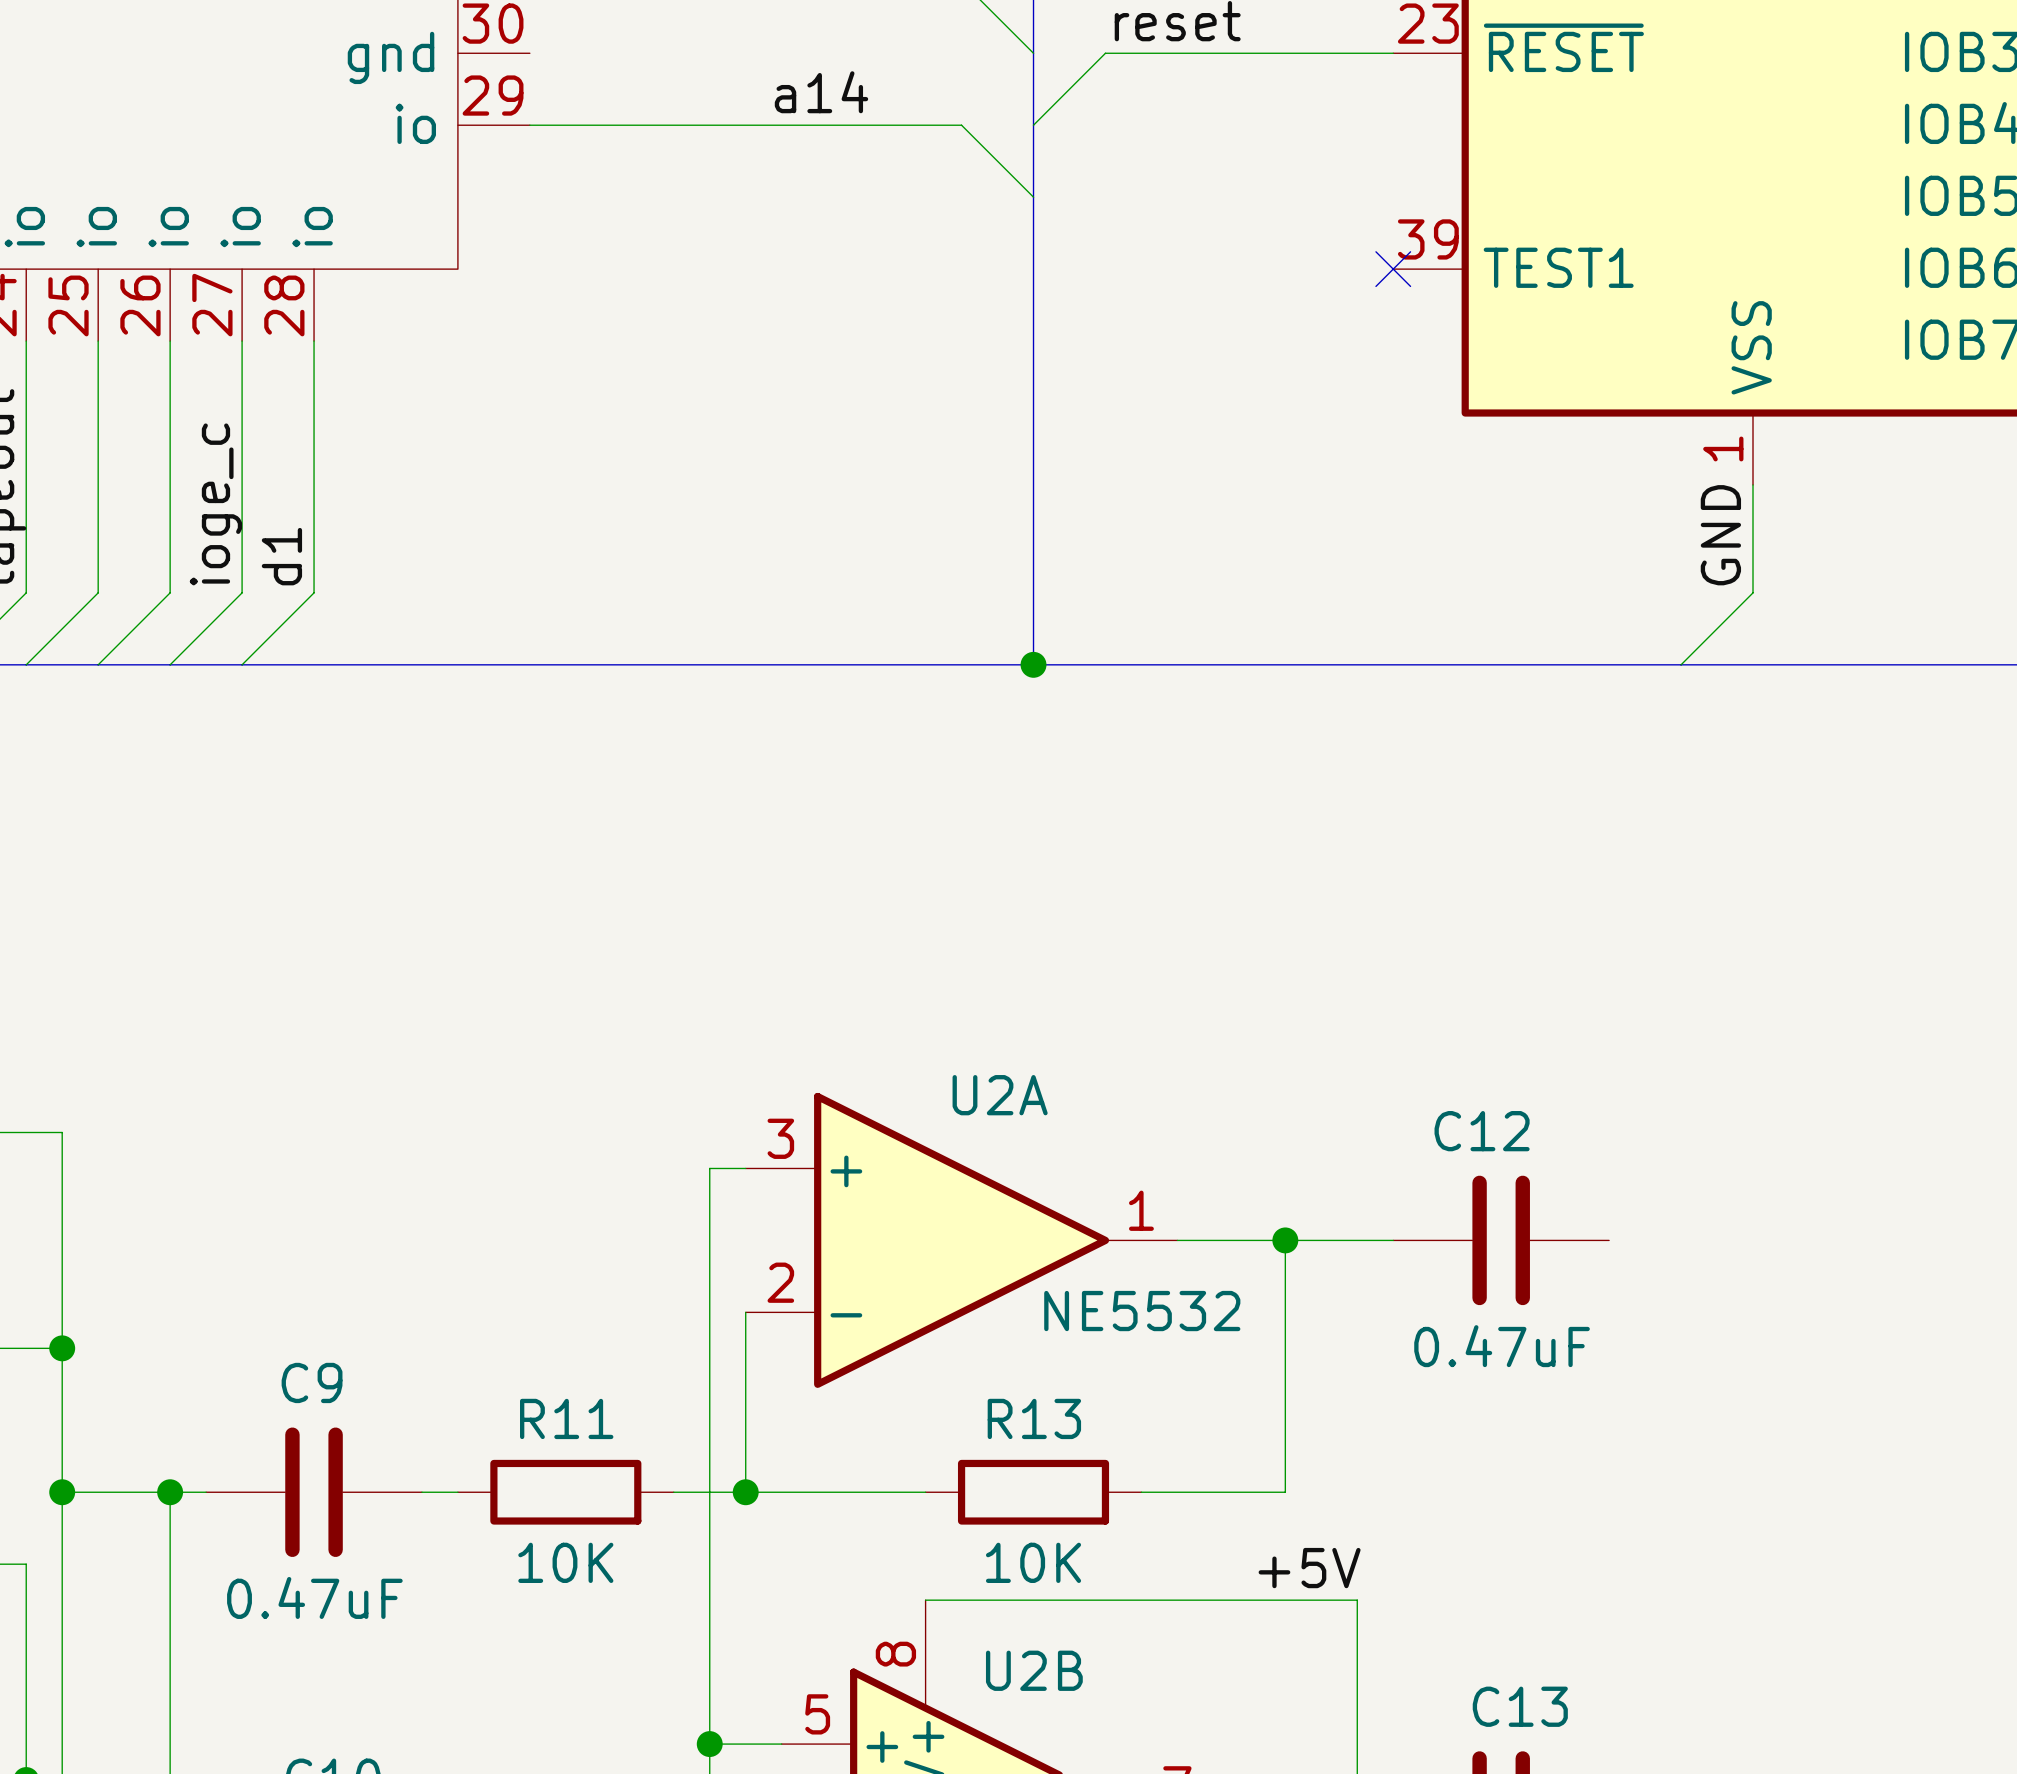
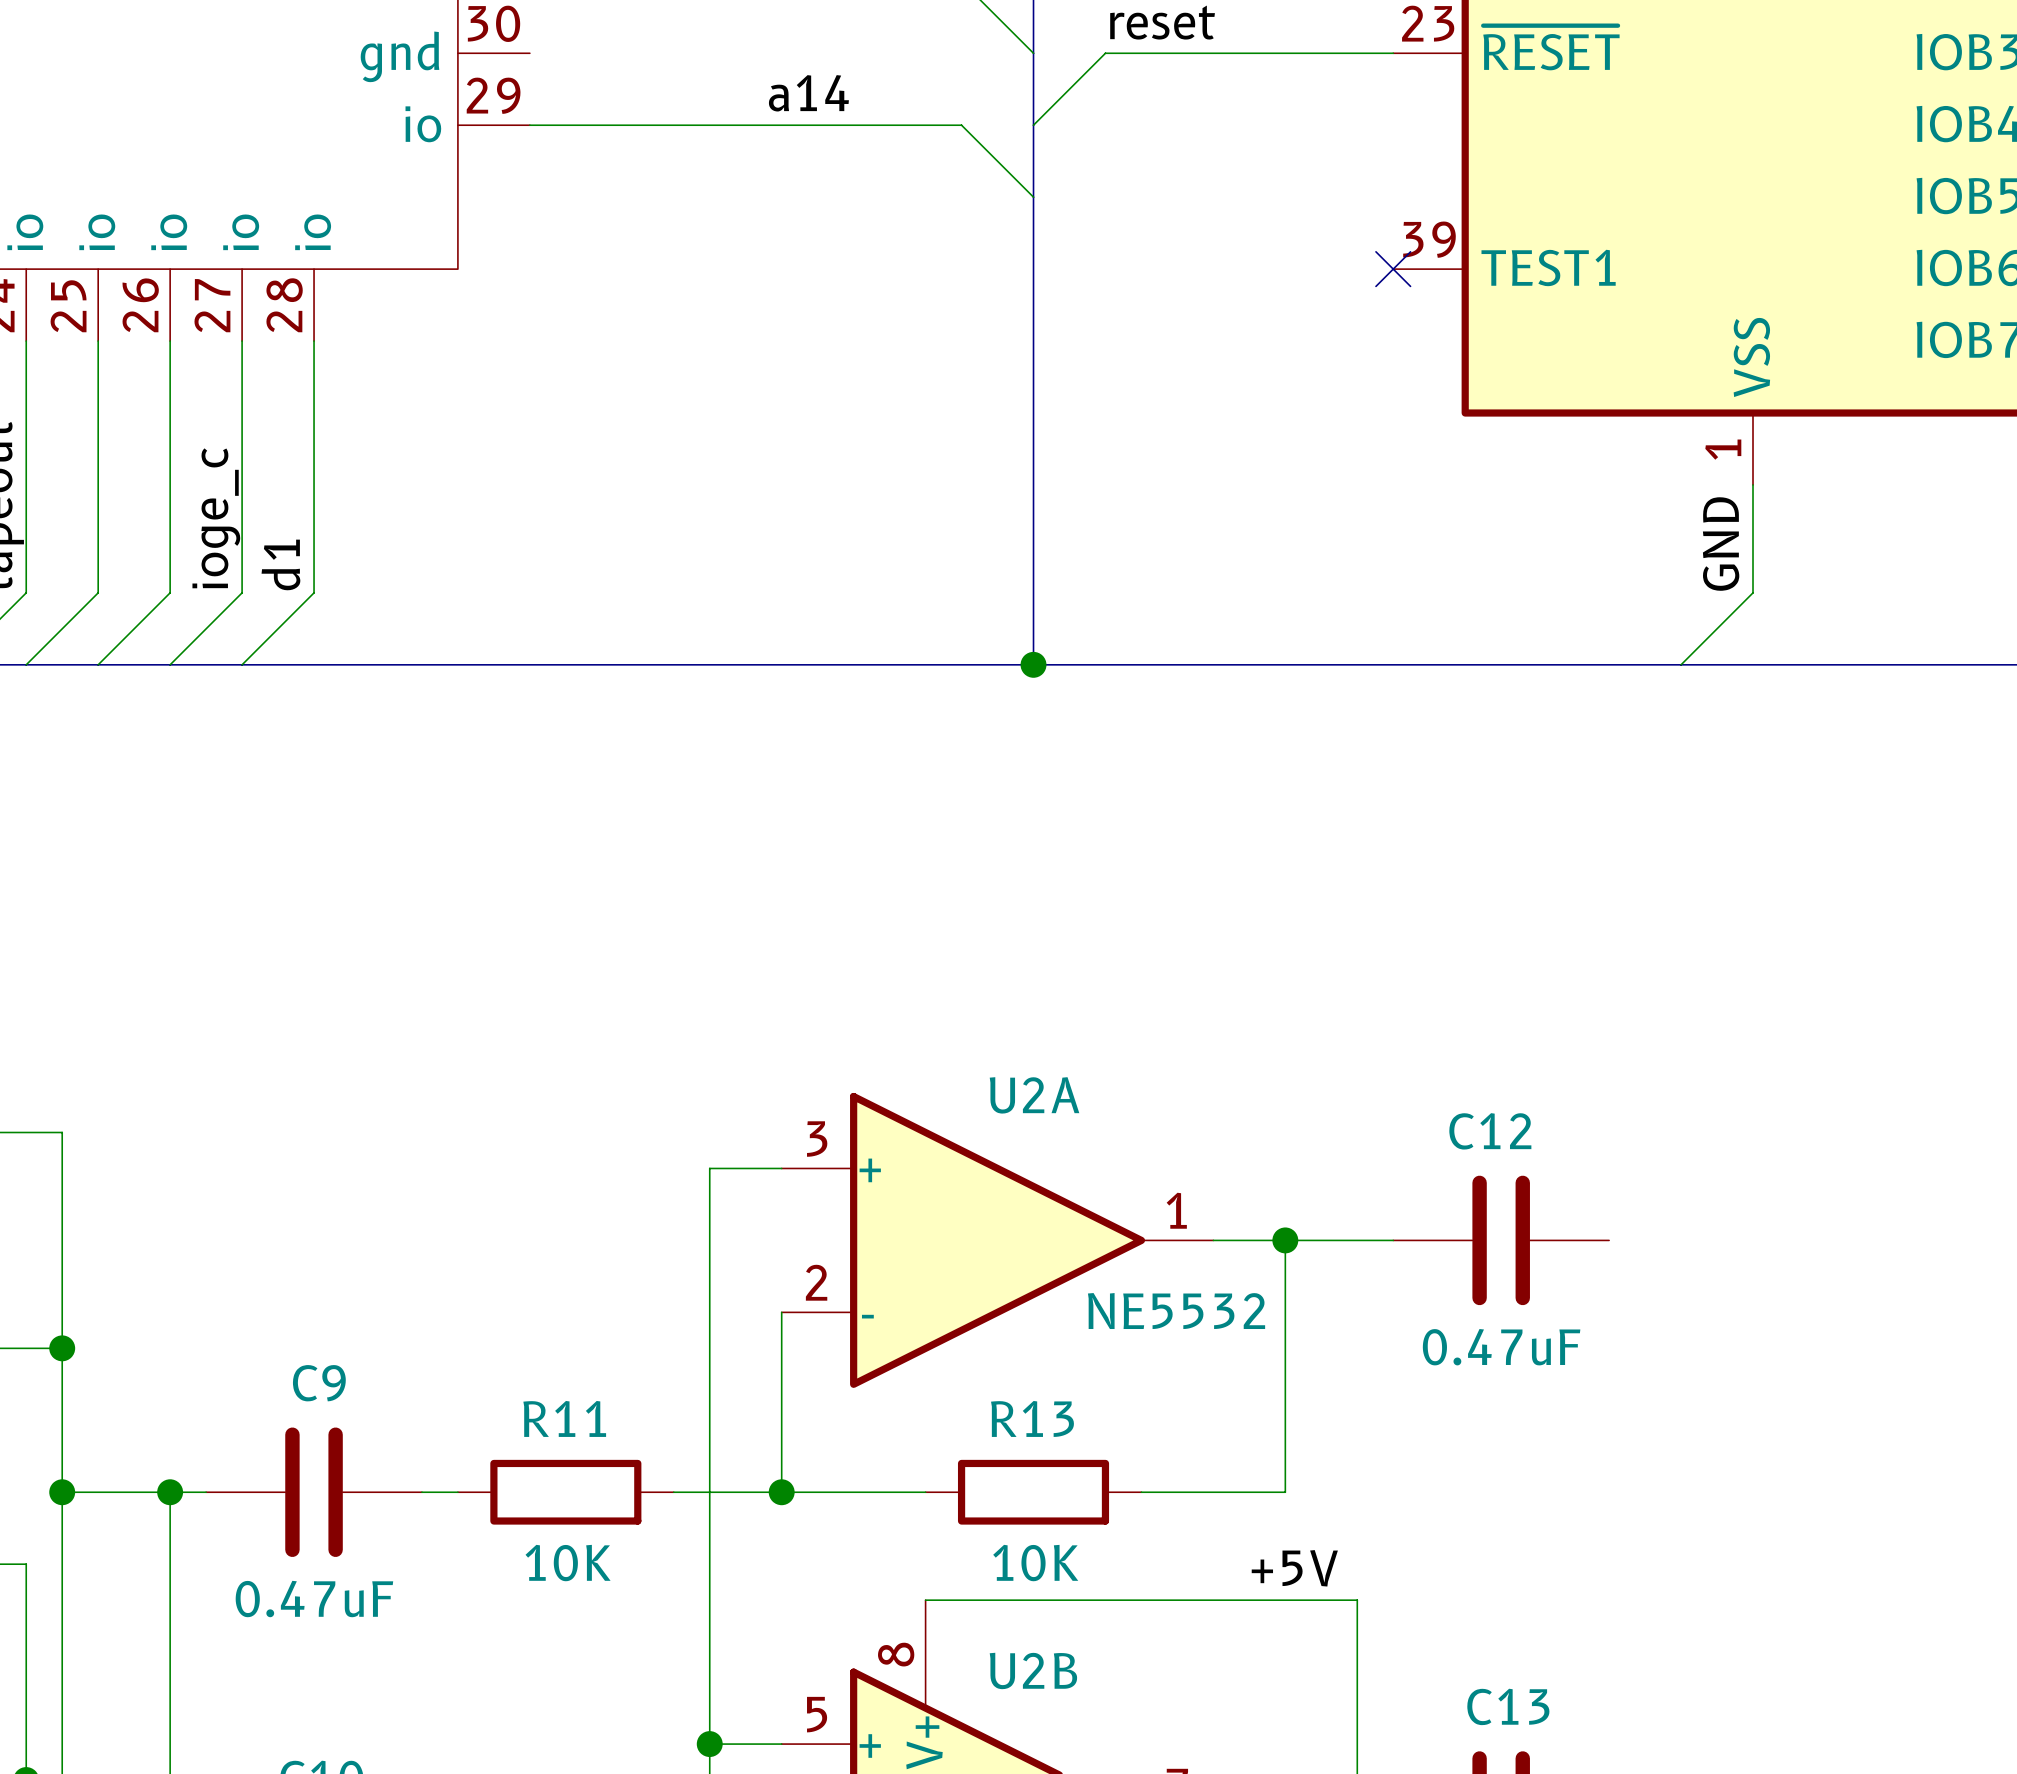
U2A position: (961, 1240) -> (997, 1240)
wire: (745, 1312) (745, 1492) -> (781, 1312) (781, 1492)
junction position: (745, 1492) -> (781, 1492)

